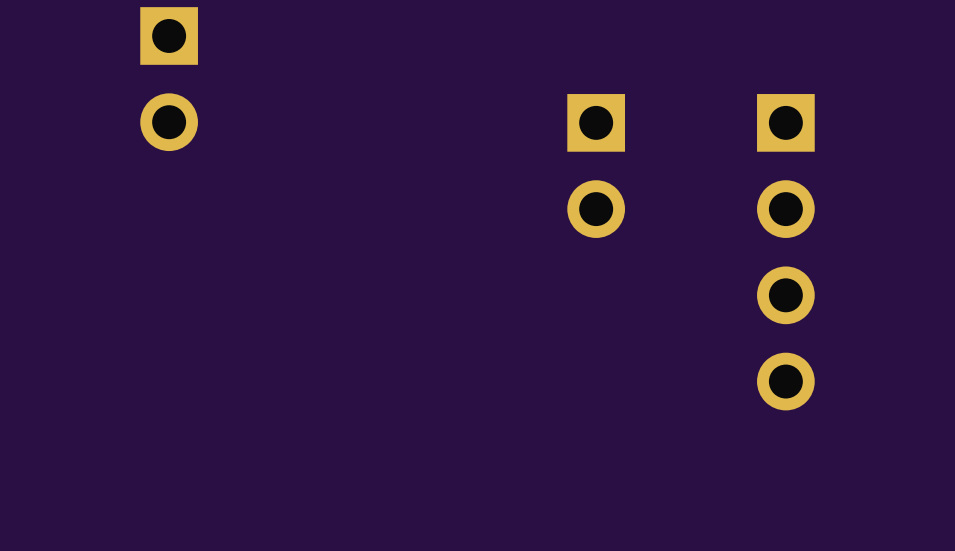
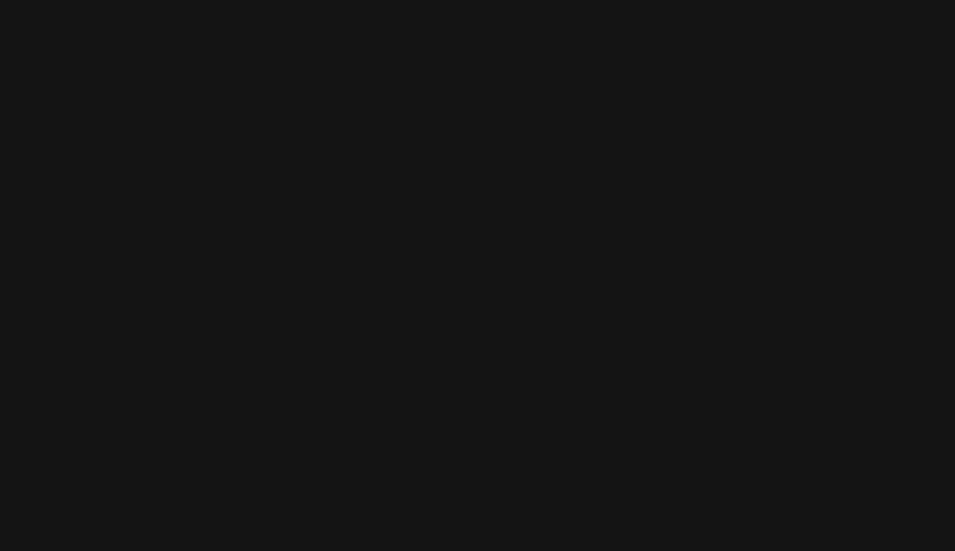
part: (169, 79) -> none
part: (596, 165) -> none
part: (785, 252) -> none

